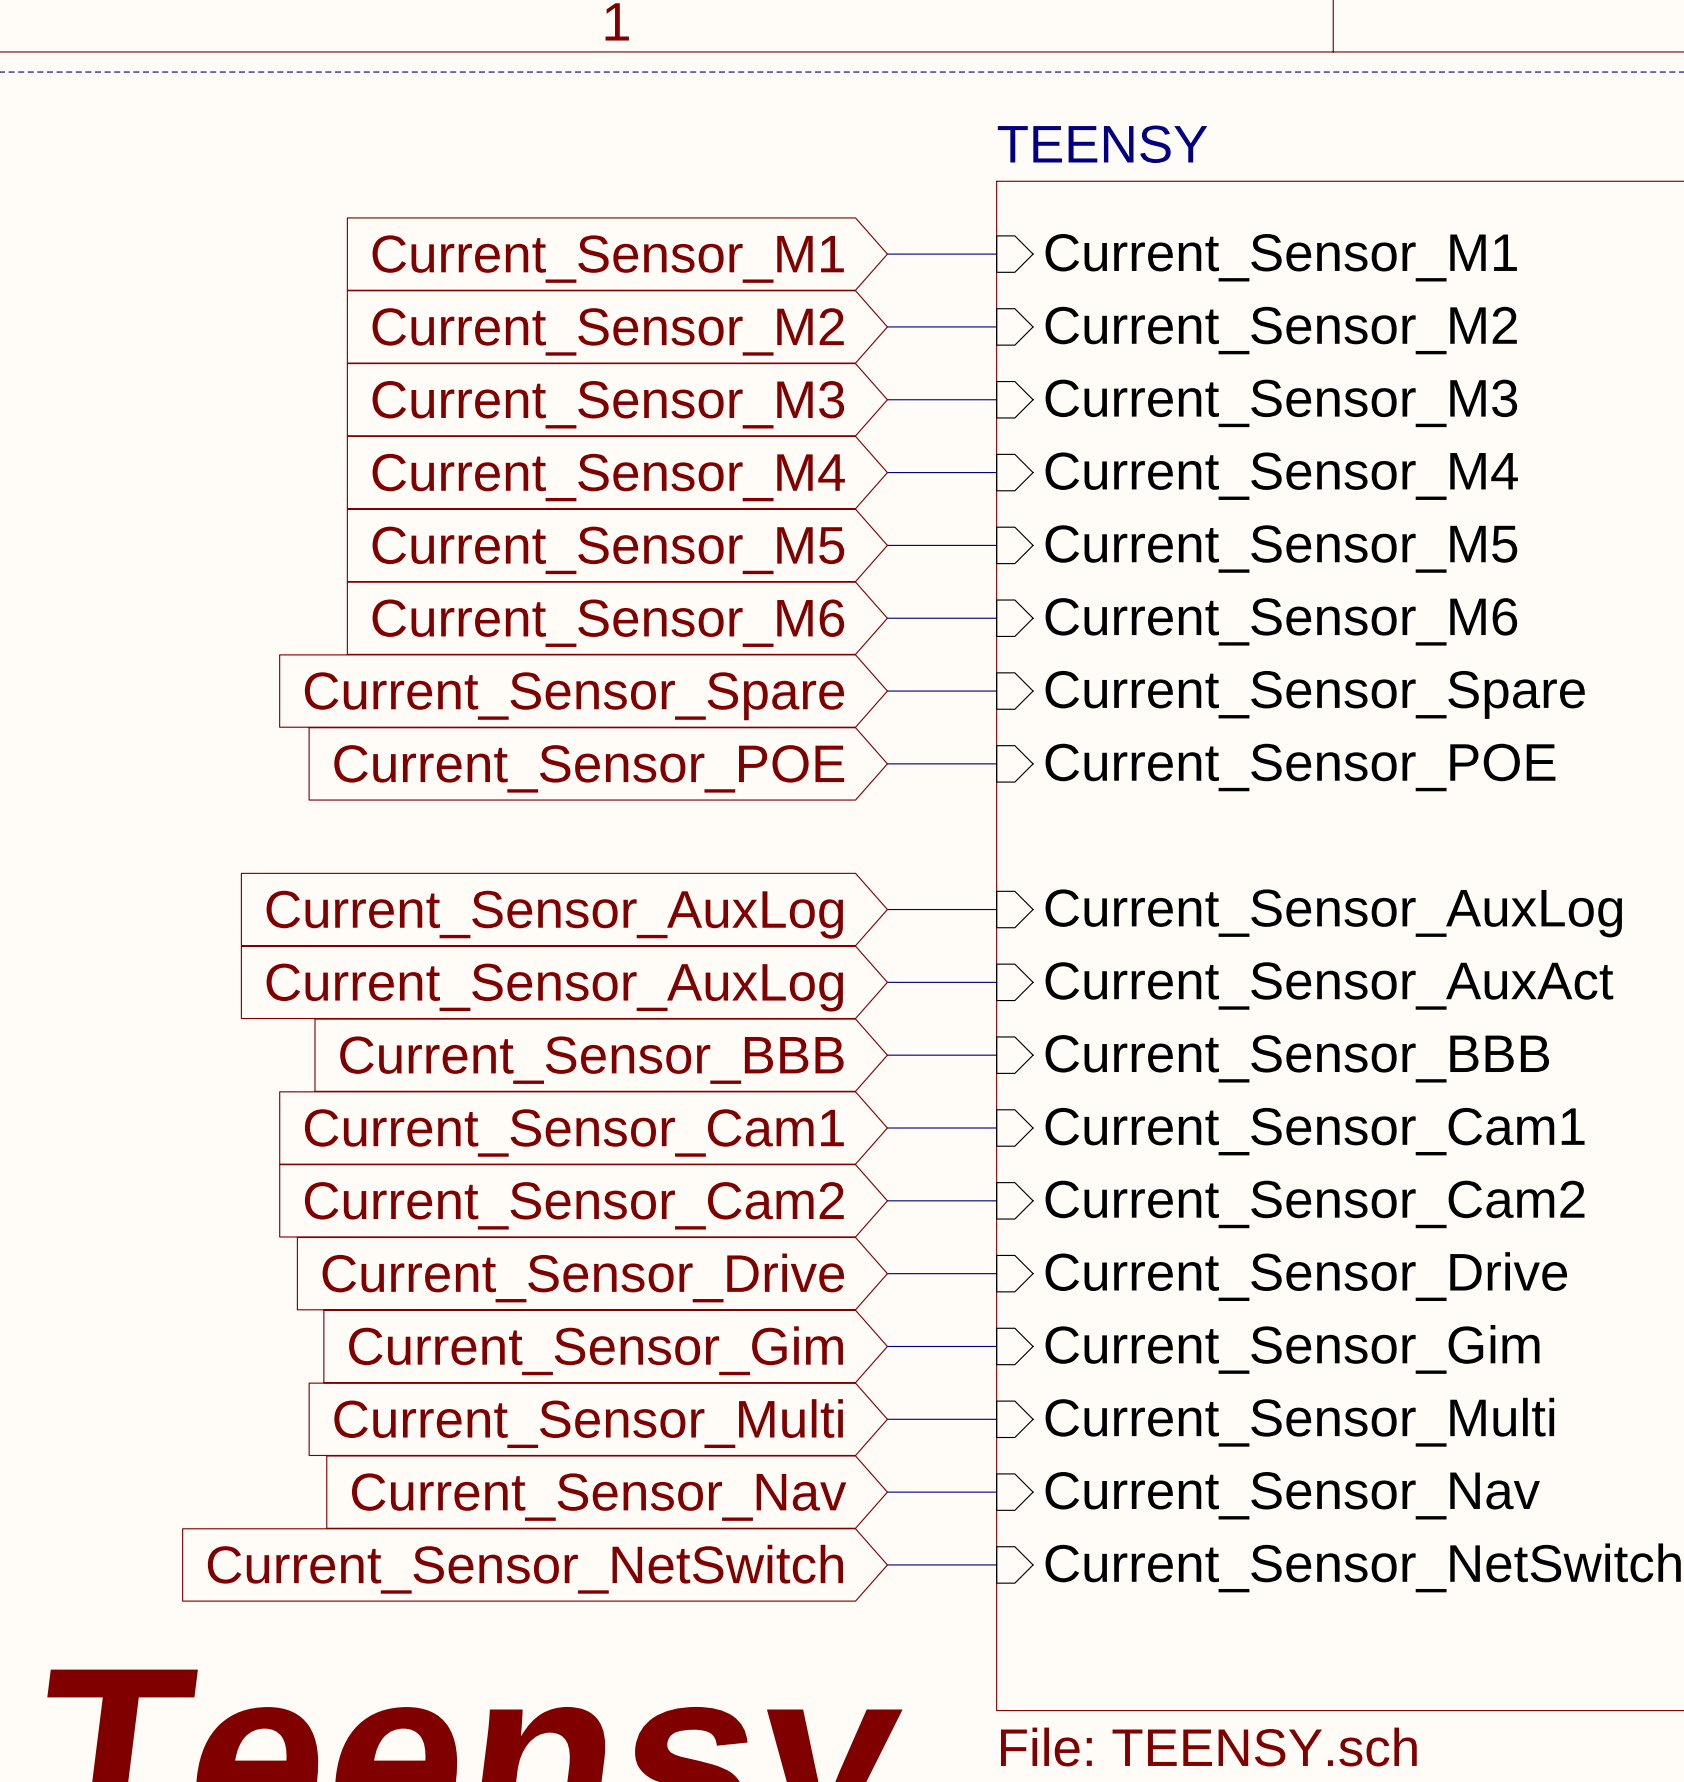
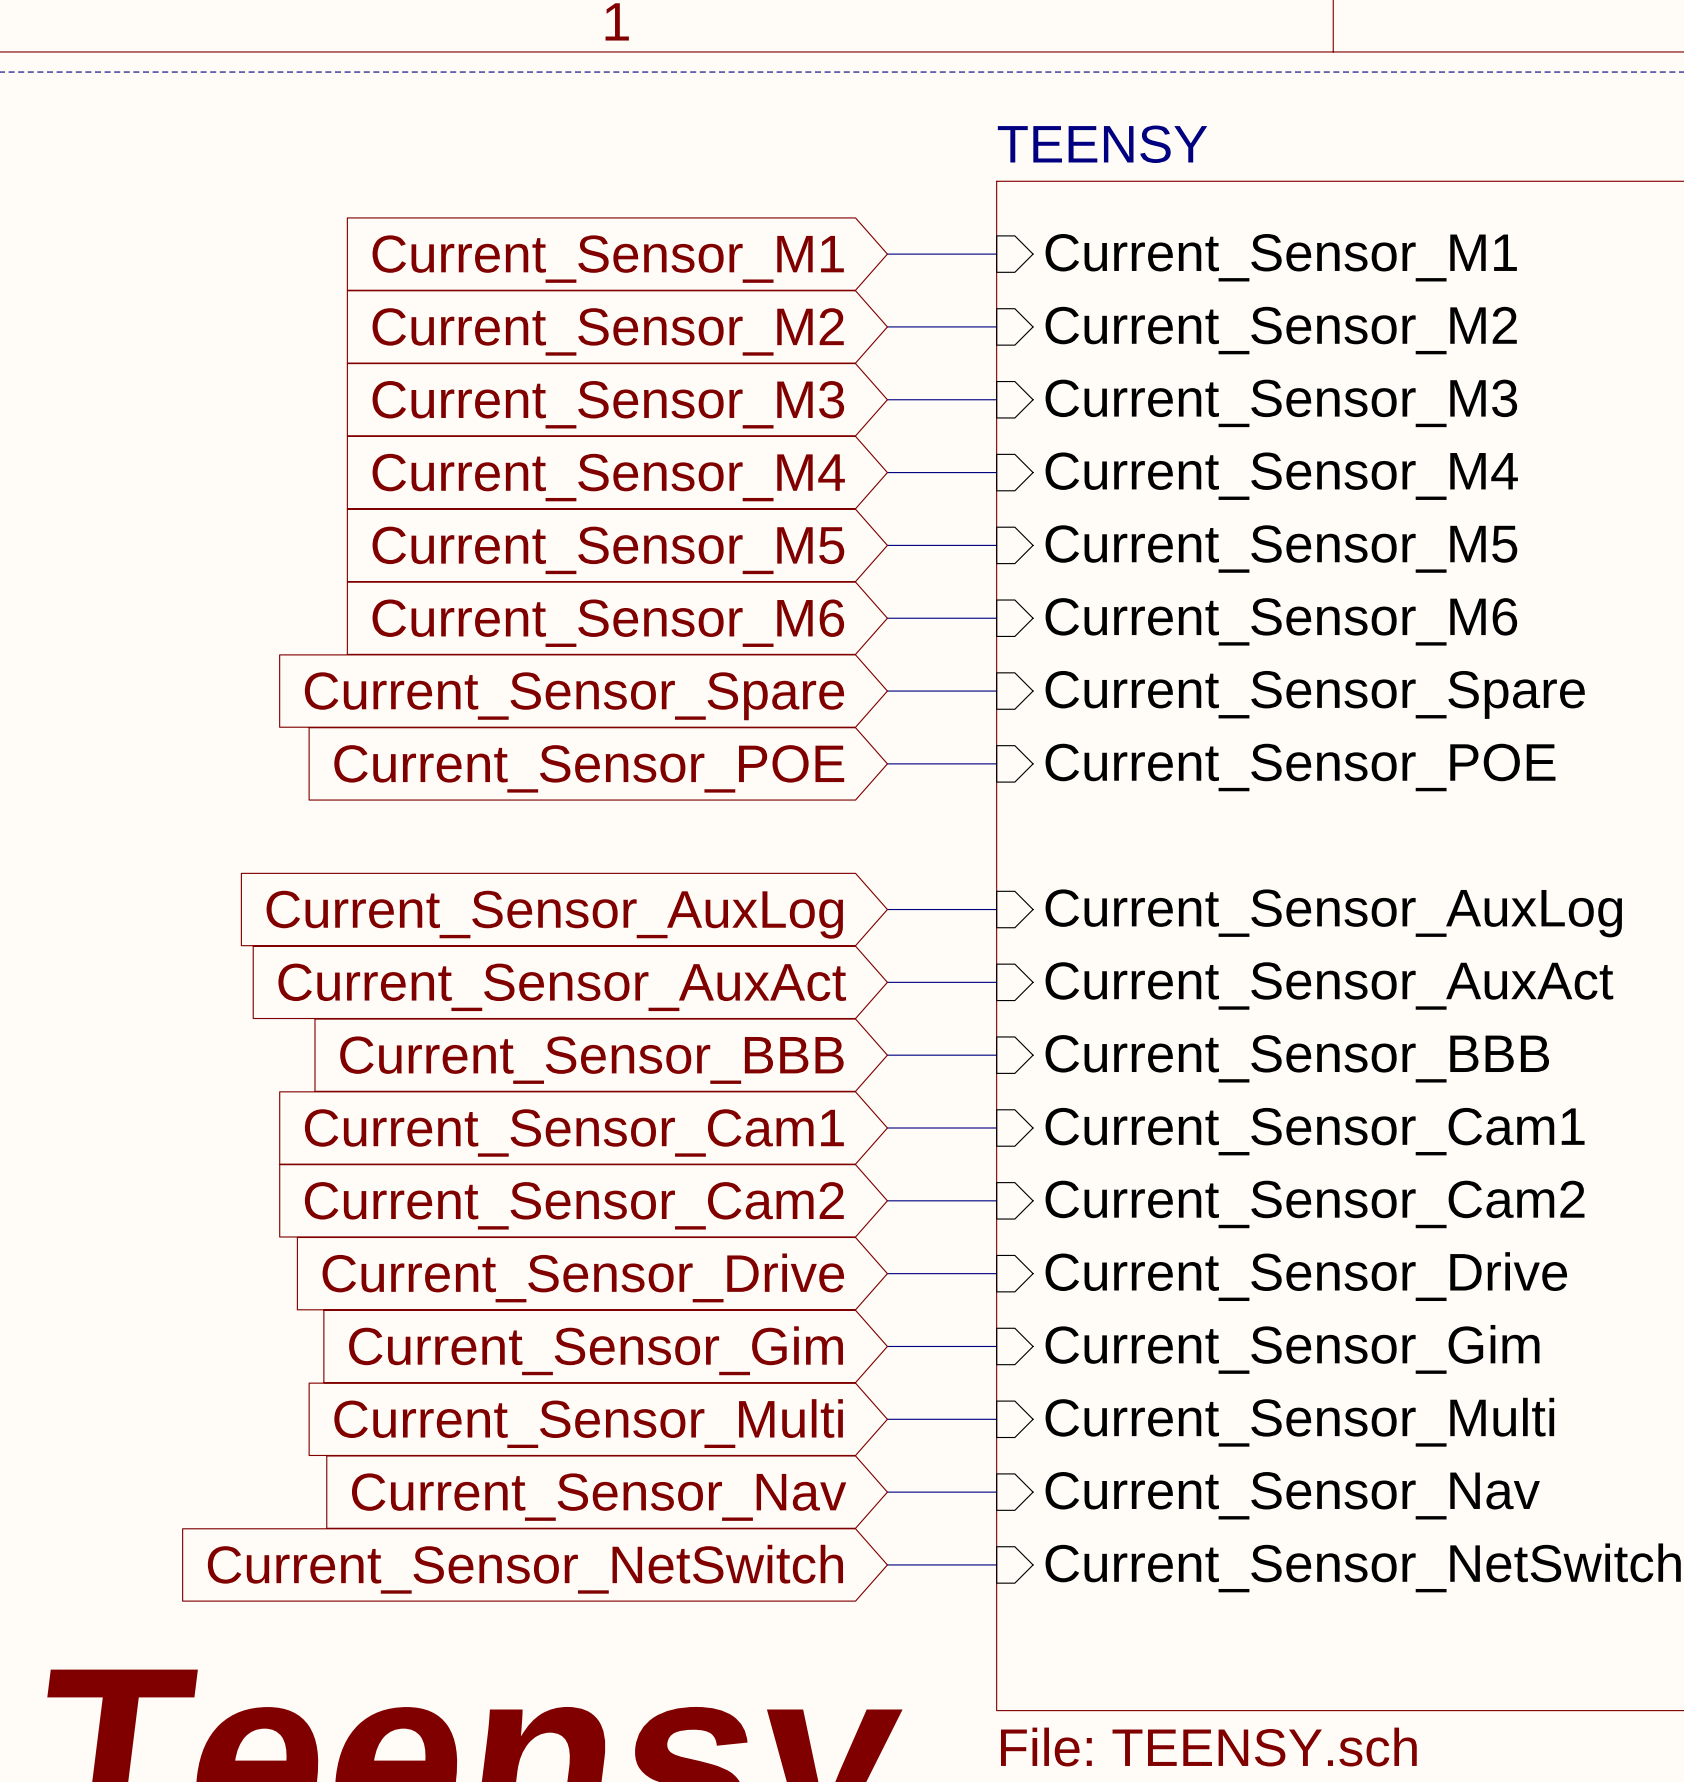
global label: Current_Sensor_AuxLog (554, 987) -> Current_Sensor_AuxAct (562, 987)

